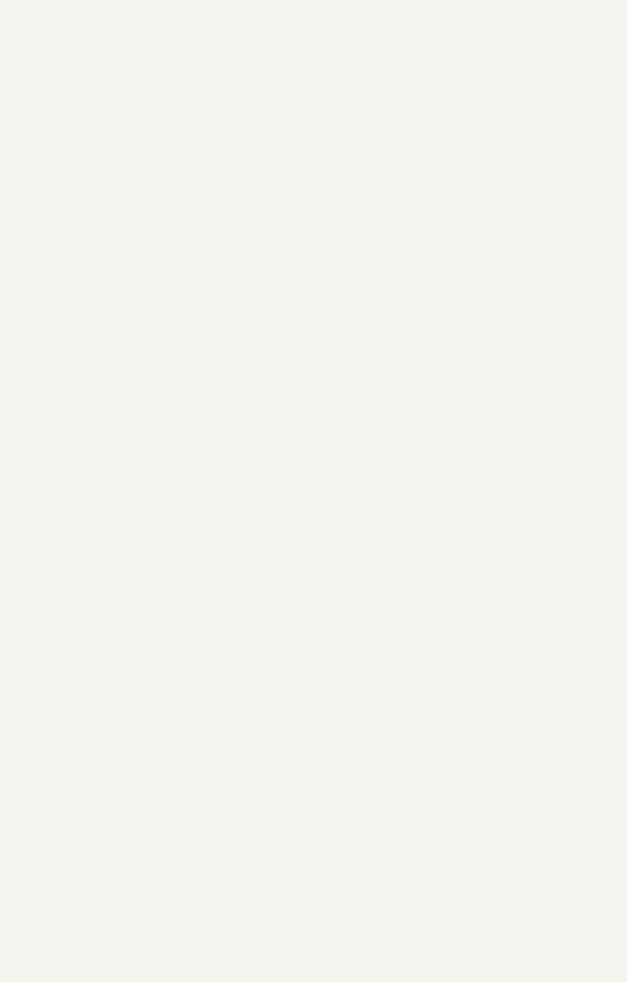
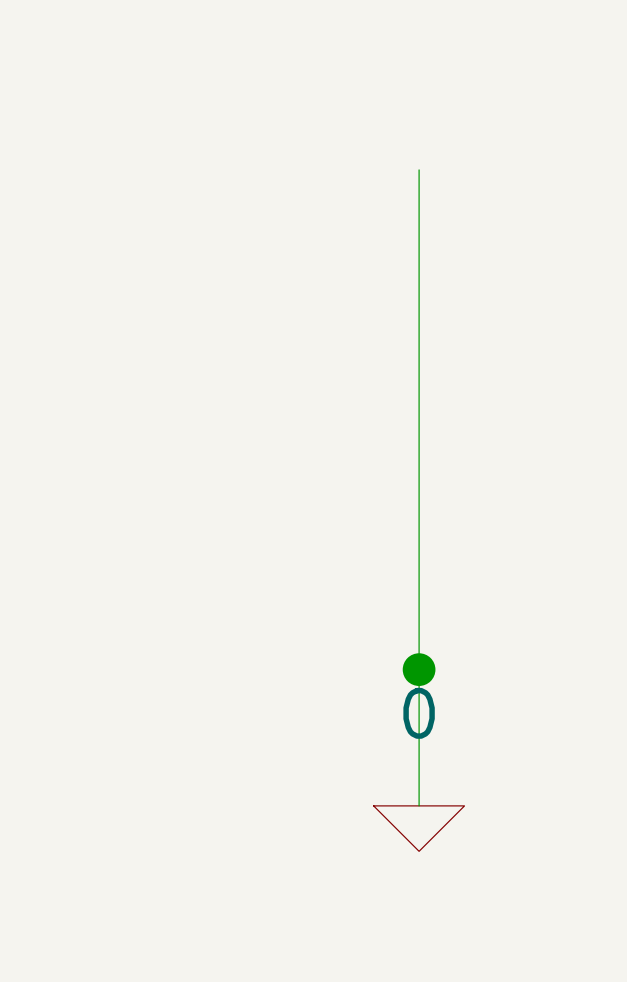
wire: none -> (419, 169) (419, 805)
junction: none -> (419, 669)
power symbol: none -> 0 (419, 828)

